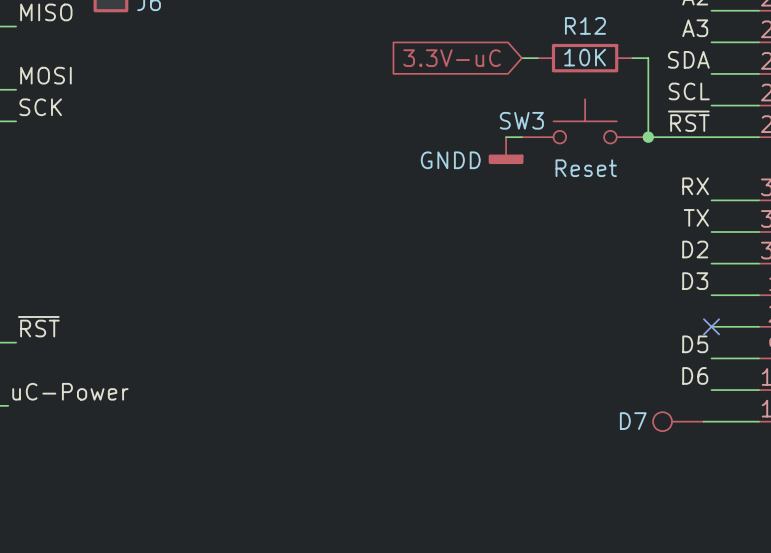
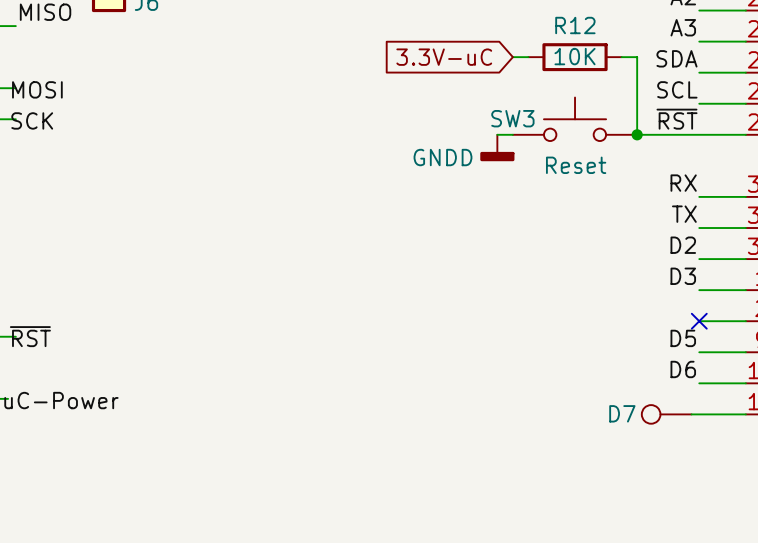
label position: MOSI (45, 75) -> MOSI (37, 89)
label position: SCK (40, 107) -> SCK (32, 120)
label position: ~{RST} (38, 326) -> ~{RST} (30, 336)
label position: uC-Power (70, 391) -> uC-Power (61, 400)

